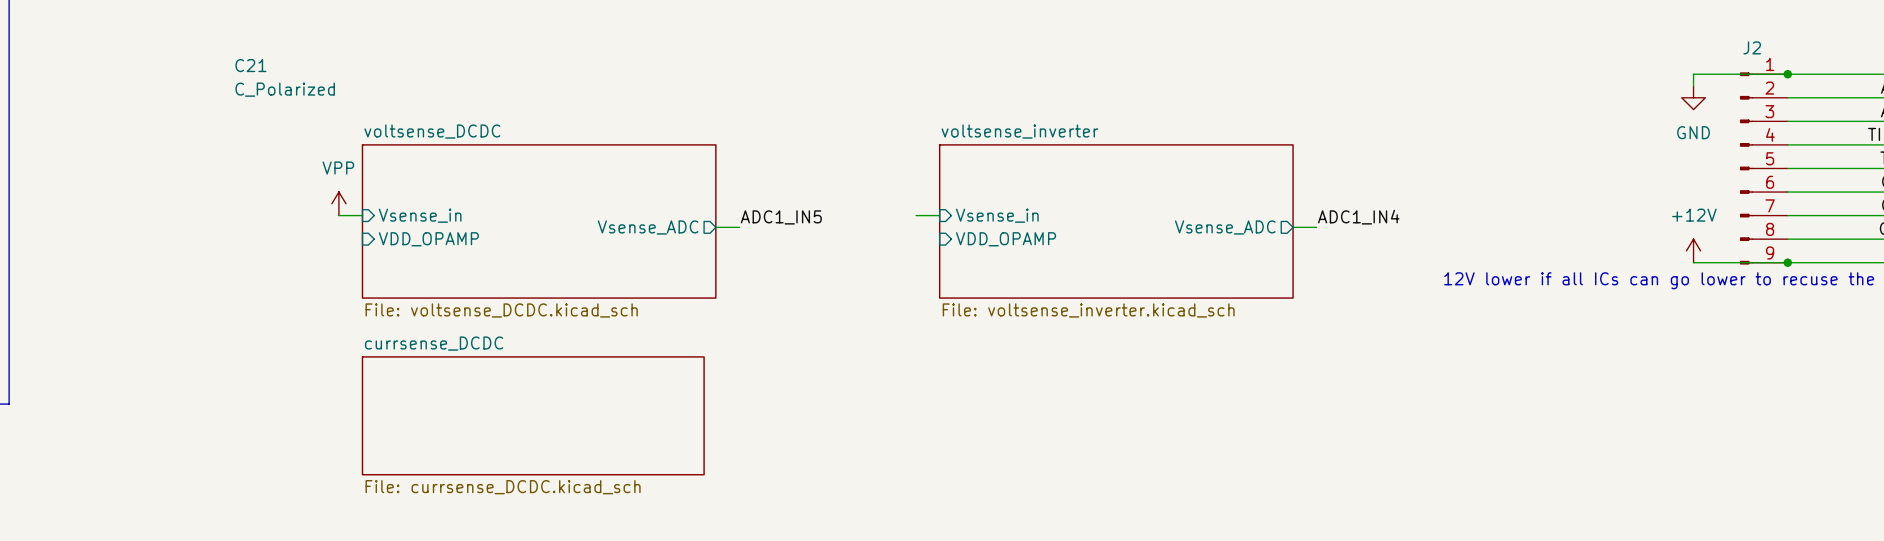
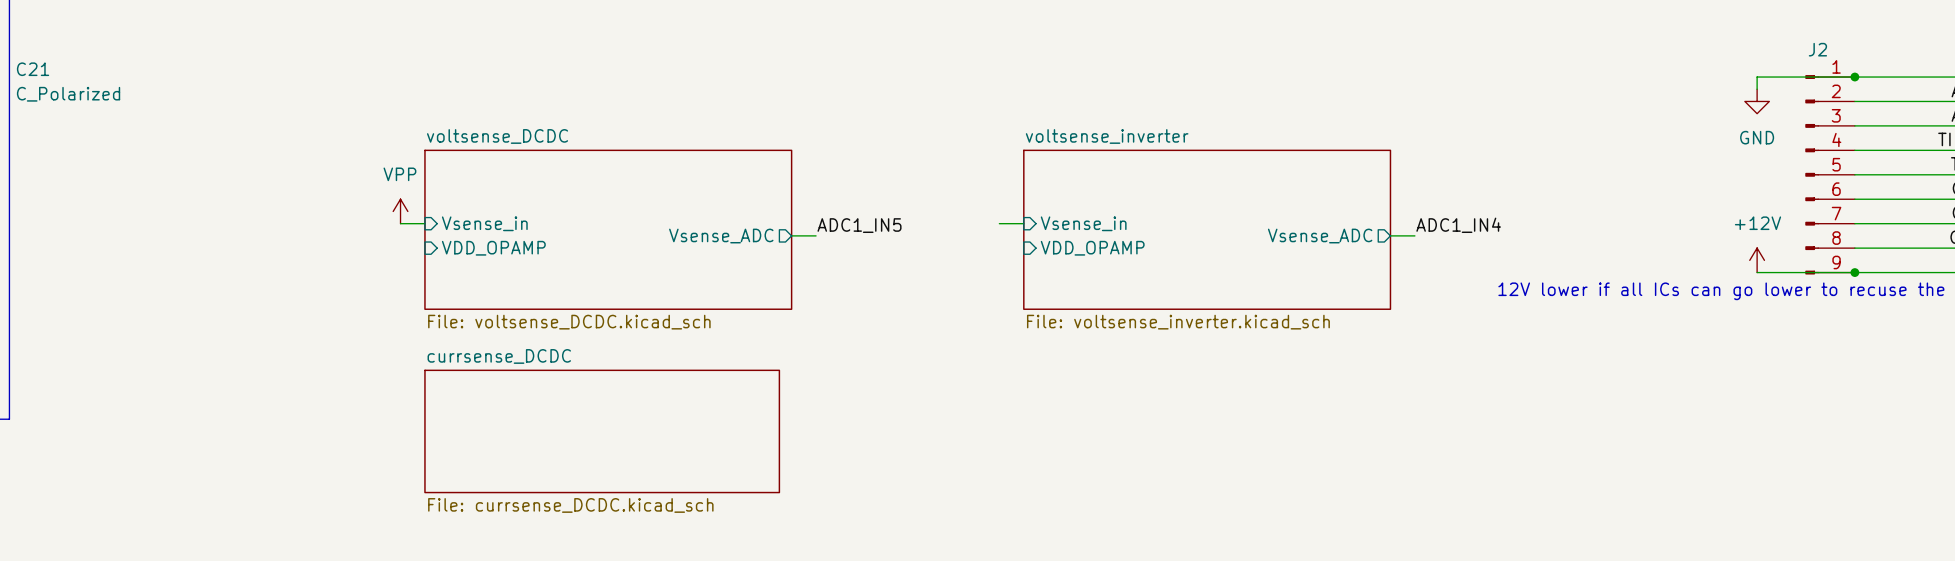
C21 name position: C21 (250, 65) -> C21 (33, 69)
C21 value position: C_Polarized (285, 89) -> C_Polarized (68, 94)
power symbol position: VPP (338, 203) -> VPP (400, 211)
wire: (338, 215) (362, 215) -> (400, 223) (424, 223)
sheet pin position: Vsense_in (420, 215) -> Vsense_in (484, 223)
wire: (916, 215) (939, 215) -> (999, 223) (1023, 223)
sheet pin position: Vsense_in (997, 215) -> Vsense_in (1083, 223)
label position: ADC1_IN5 (781, 217) -> ADC1_IN5 (859, 225)
label position: ADC1_IN4 (1358, 217) -> ADC1_IN4 (1458, 225)
sheet voltsense_DCDC position: (539, 221) -> (608, 229)
sheet voltsense_inverter position: (1116, 221) -> (1207, 229)
sheet pin position: Vsense_ADC (648, 227) -> Vsense_ADC (721, 236)
wire: (715, 227) (739, 227) -> (791, 235) (816, 235)
sheet pin position: Vsense_ADC (1225, 227) -> Vsense_ADC (1320, 236)
wire: (1293, 227) (1316, 227) -> (1390, 235) (1414, 235)
sheet pin position: VDD_OPAMP (428, 239) -> VDD_OPAMP (493, 248)
sheet pin position: VDD_OPAMP (1006, 239) -> VDD_OPAMP (1092, 248)
sheet currsense_DCDC position: (533, 415) -> (602, 431)

